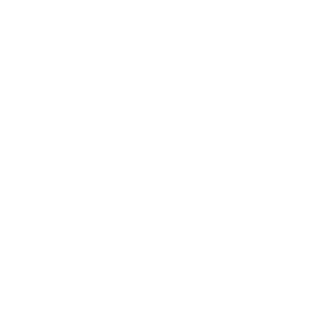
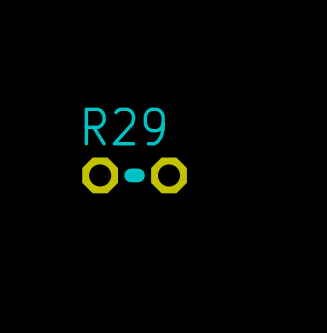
R29: none -> (134, 175)

